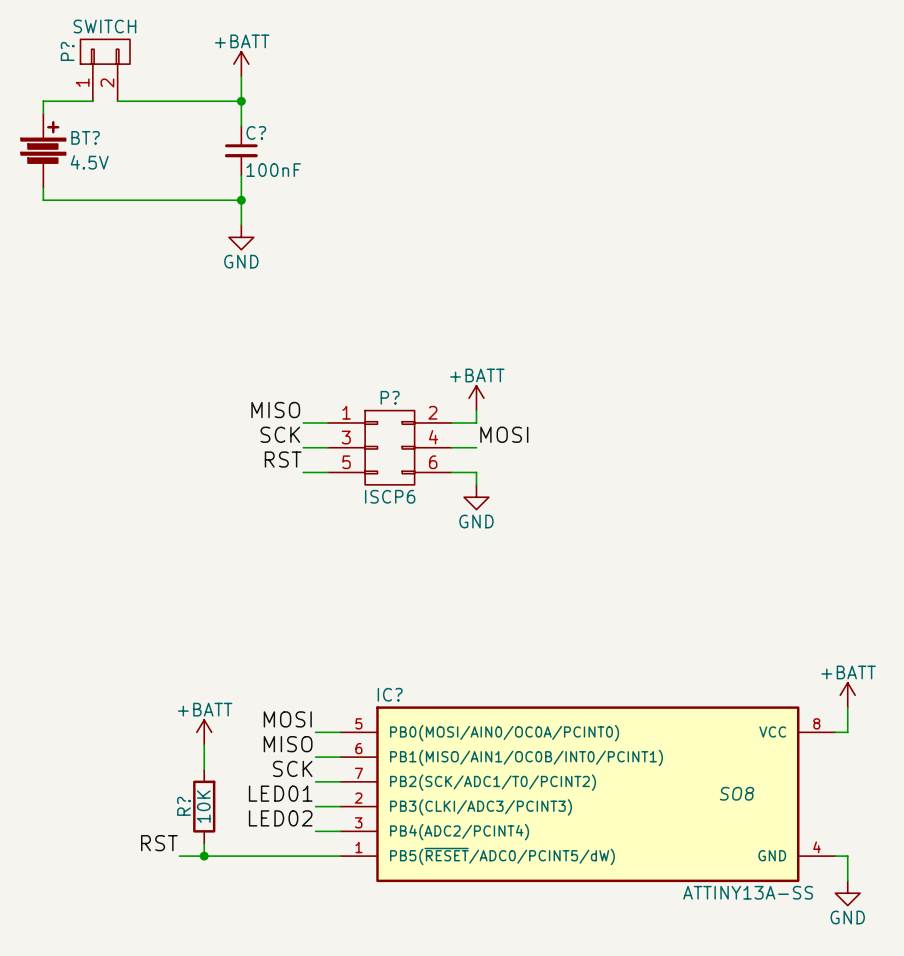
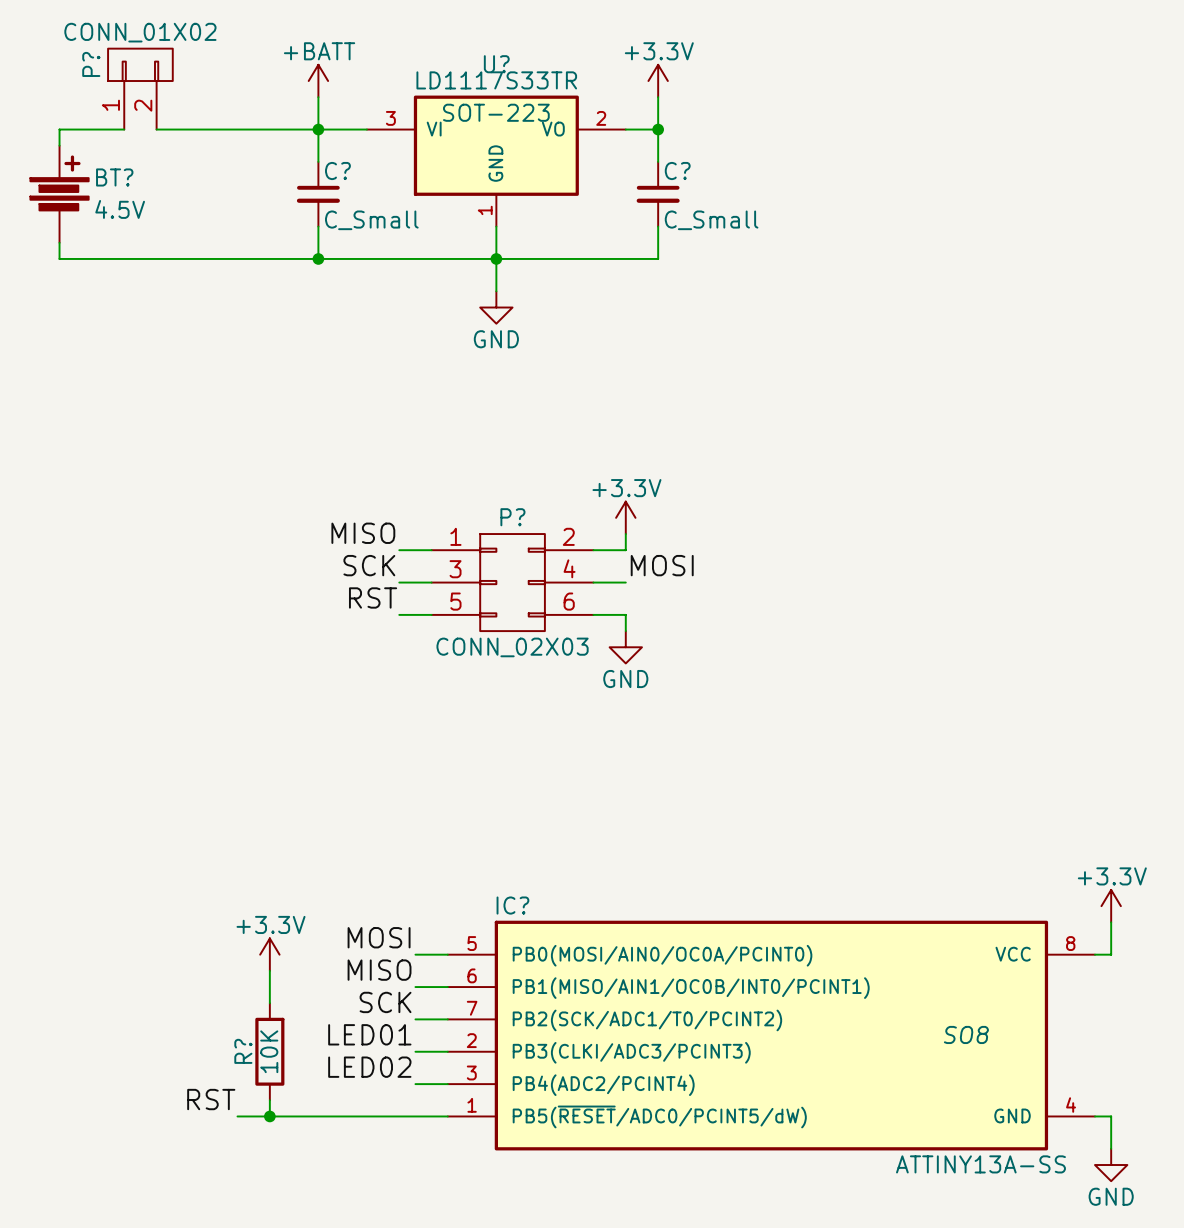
P? value: SWITCH (104, 26) -> CONN_01X02 (140, 32)
power symbol: none -> +3.3V (658, 81)
wire: none -> (658, 97) (658, 161)
wire: none -> (318, 129) (366, 129)
wire: none -> (625, 129) (658, 129)
junction: none -> (658, 129)
U?: none -> LD1117S33TR (496, 161)
C?: none -> C_Small (658, 194)
C? value: 100nF (273, 170) -> C_Small (371, 220)
wire: none -> (496, 226) (496, 291)
wire: (241, 200) (241, 224) -> (318, 258) (658, 258) (658, 226)
junction: none -> (496, 258)
power symbol position: GND (241, 237) -> GND (496, 307)
power symbol: +BATT (476, 398) -> +3.3V (625, 517)
P? value: ISCP6 (390, 496) -> CONN_02X03 (512, 647)
power symbol: +BATT (847, 695) -> +3.3V (1111, 906)
power symbol: +BATT (204, 732) -> +3.3V (269, 954)

